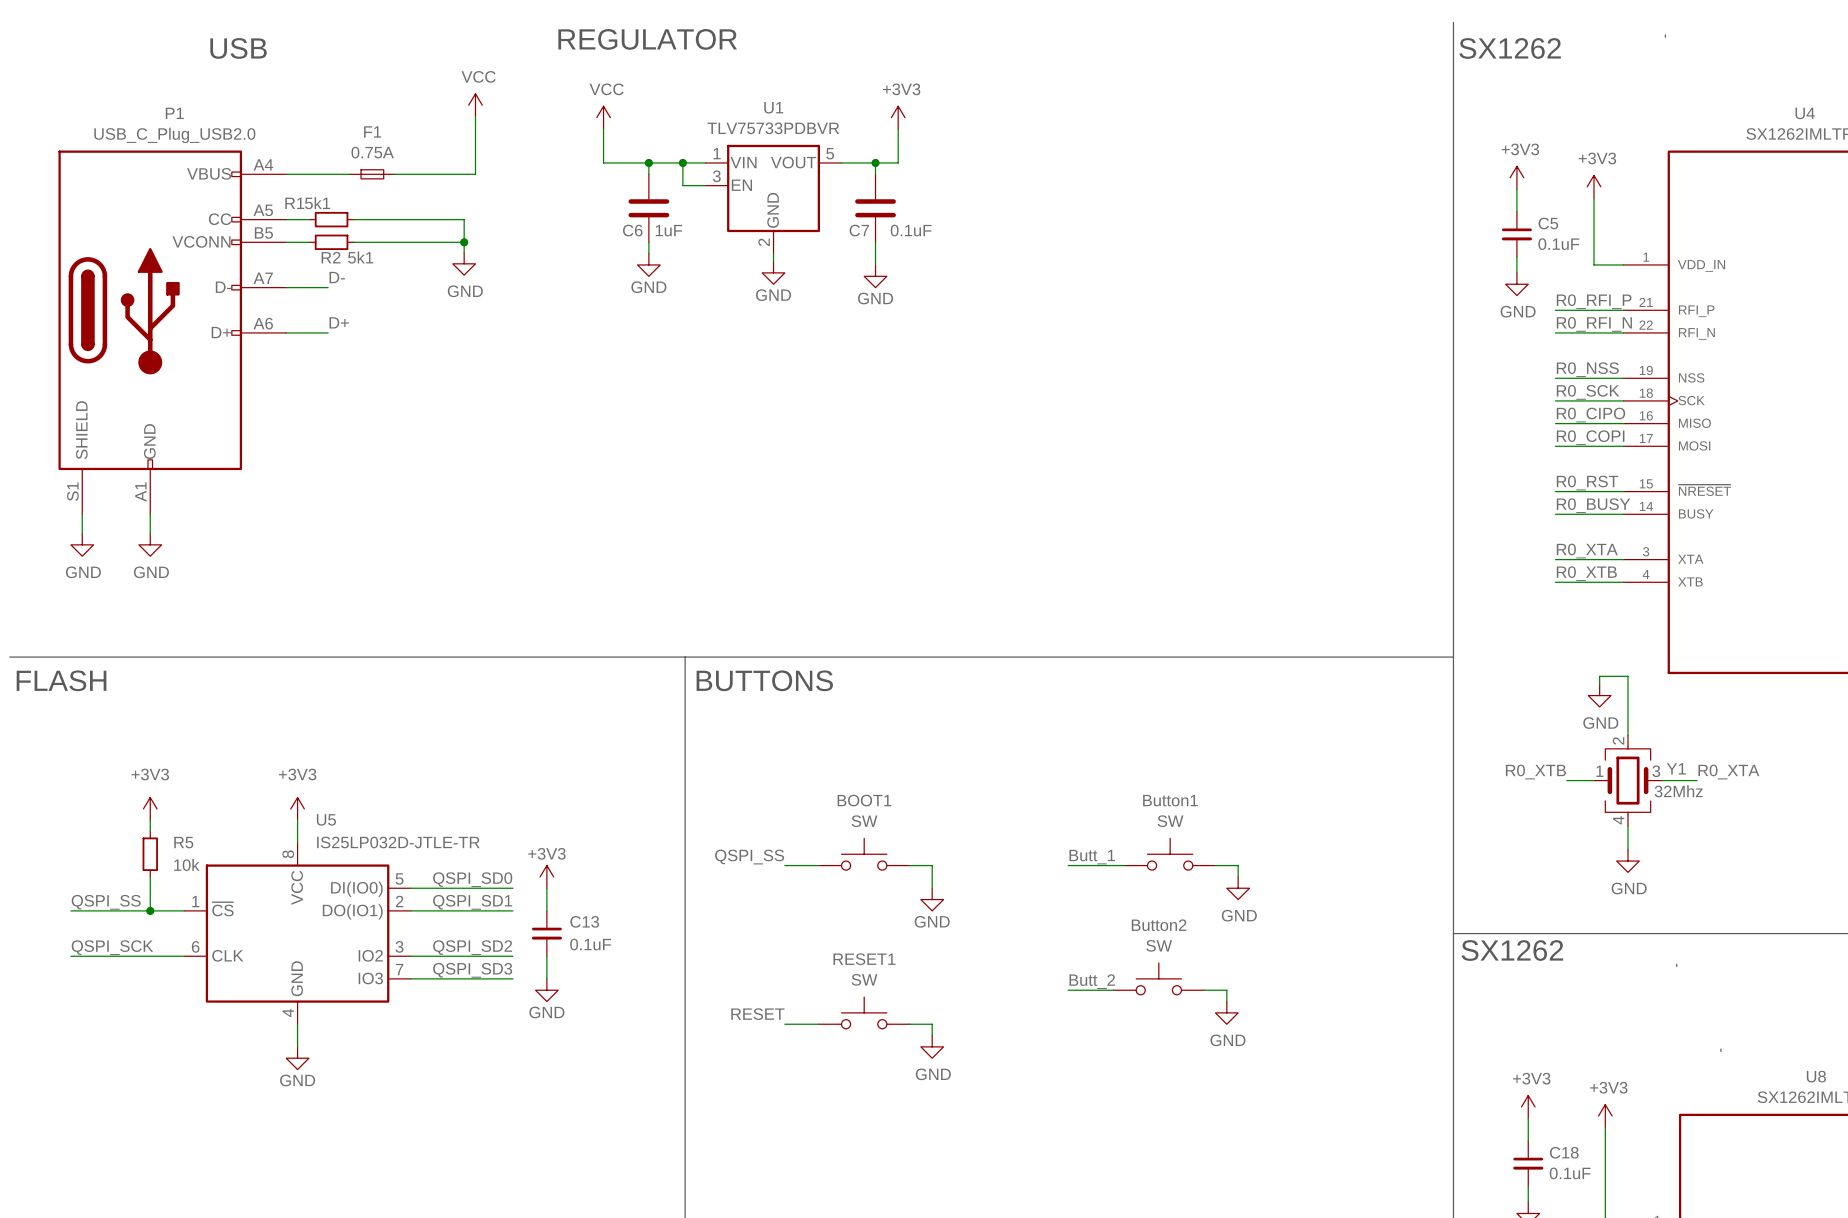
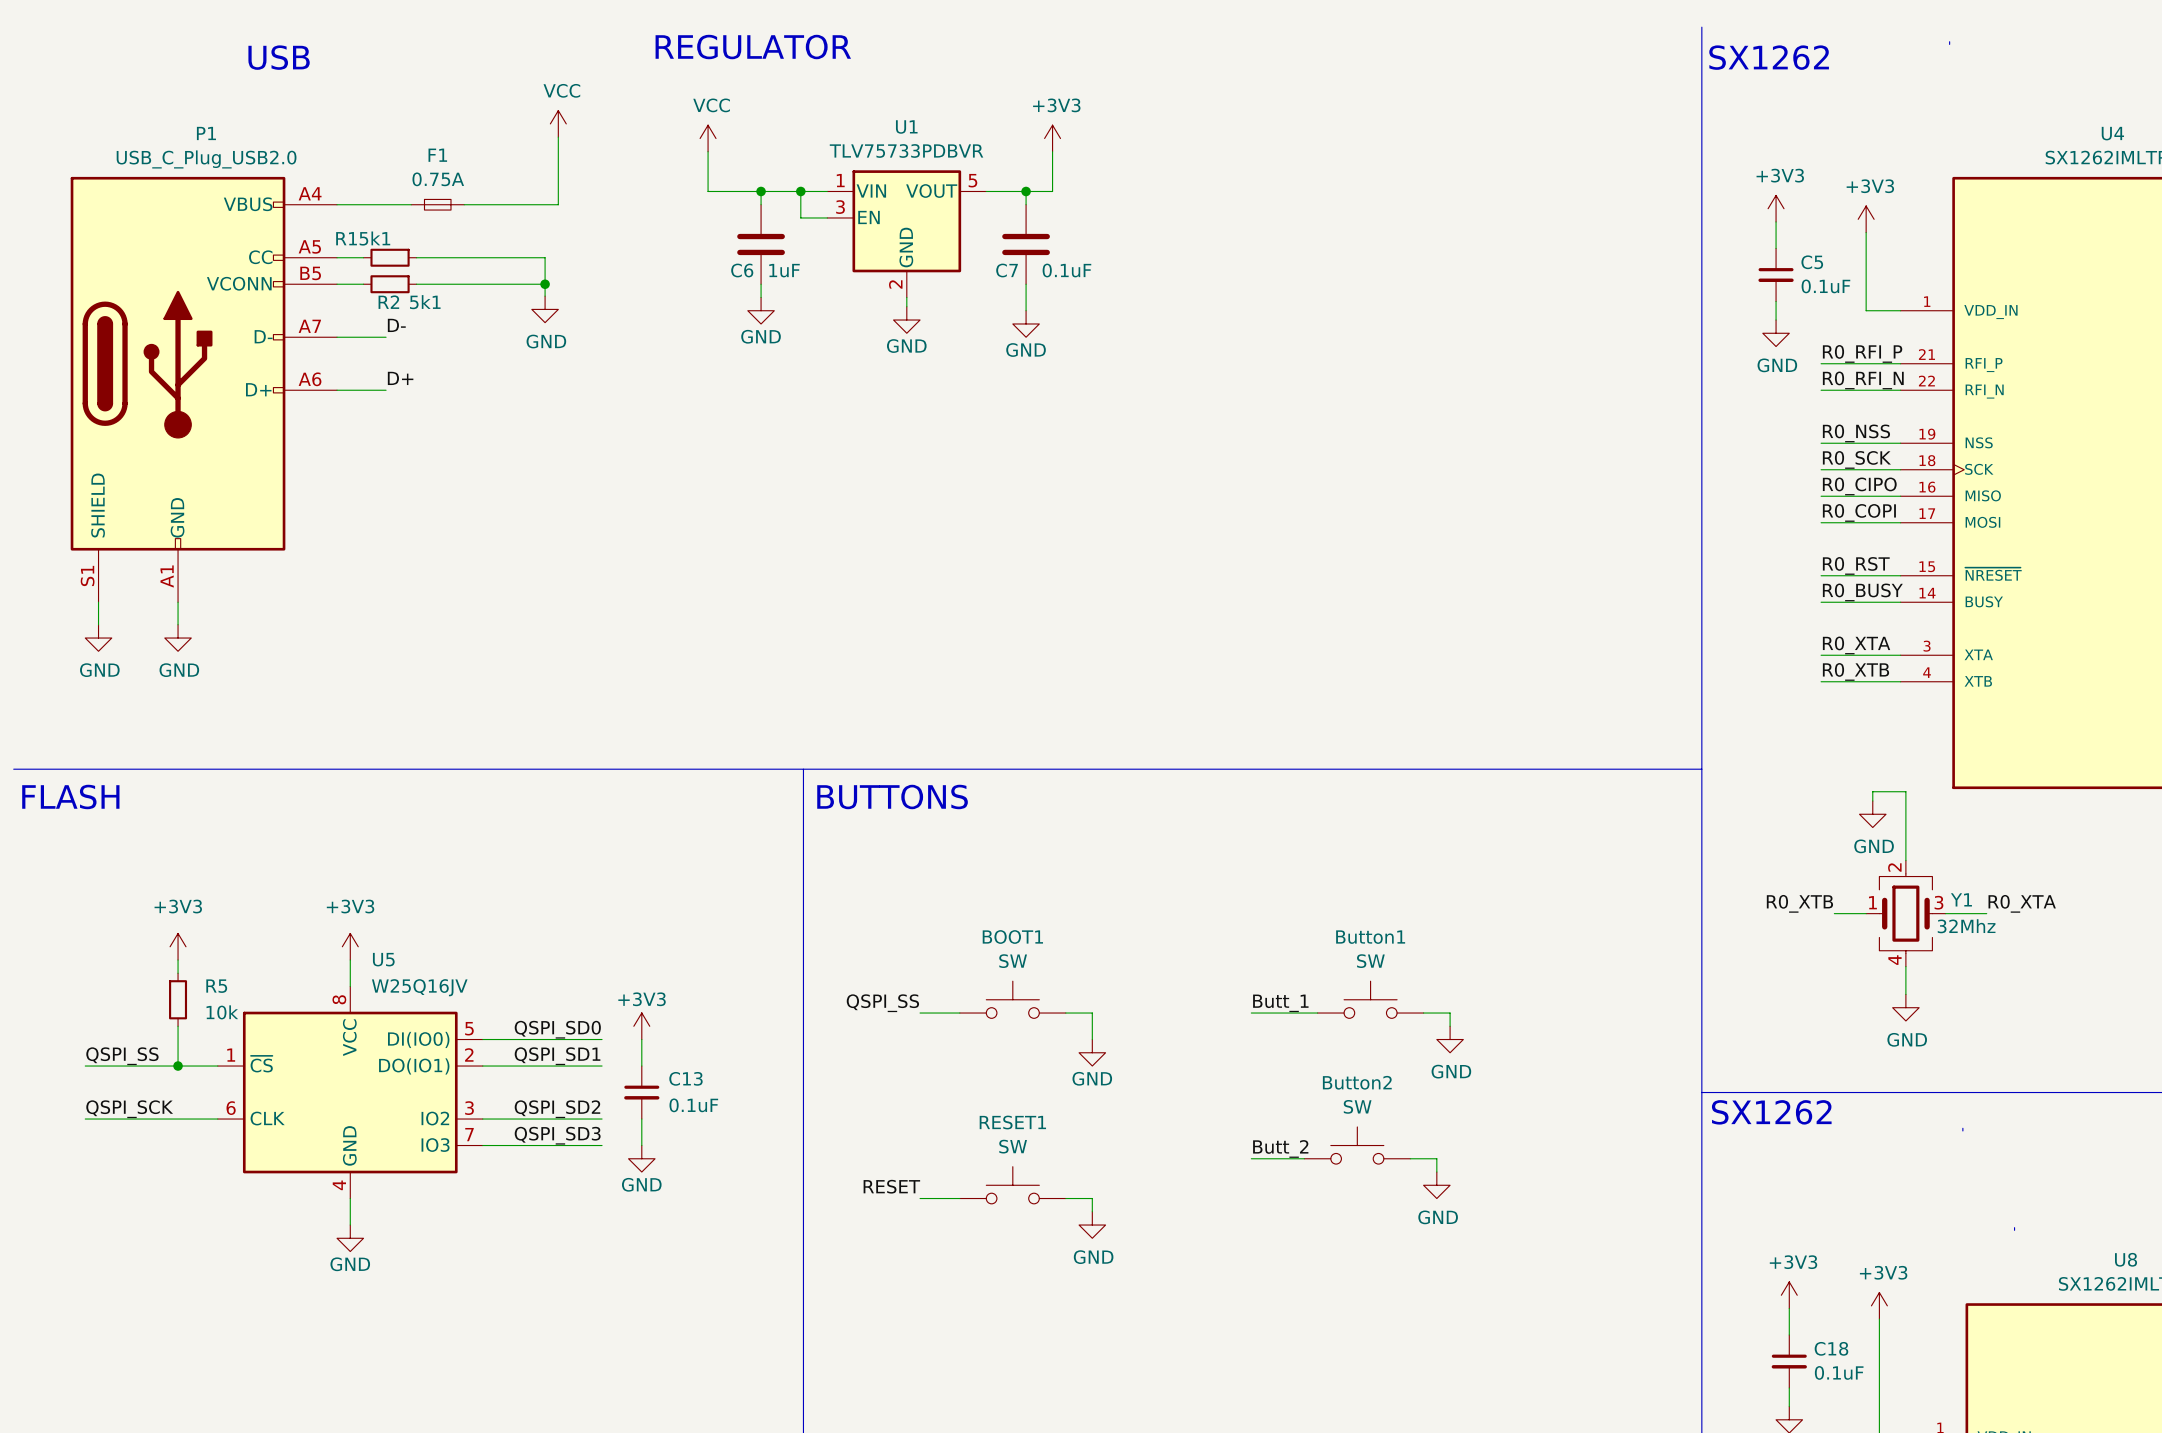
U5 value: IS25LP032D-JTLE-TR (398, 842) -> W25Q16JV (419, 987)

